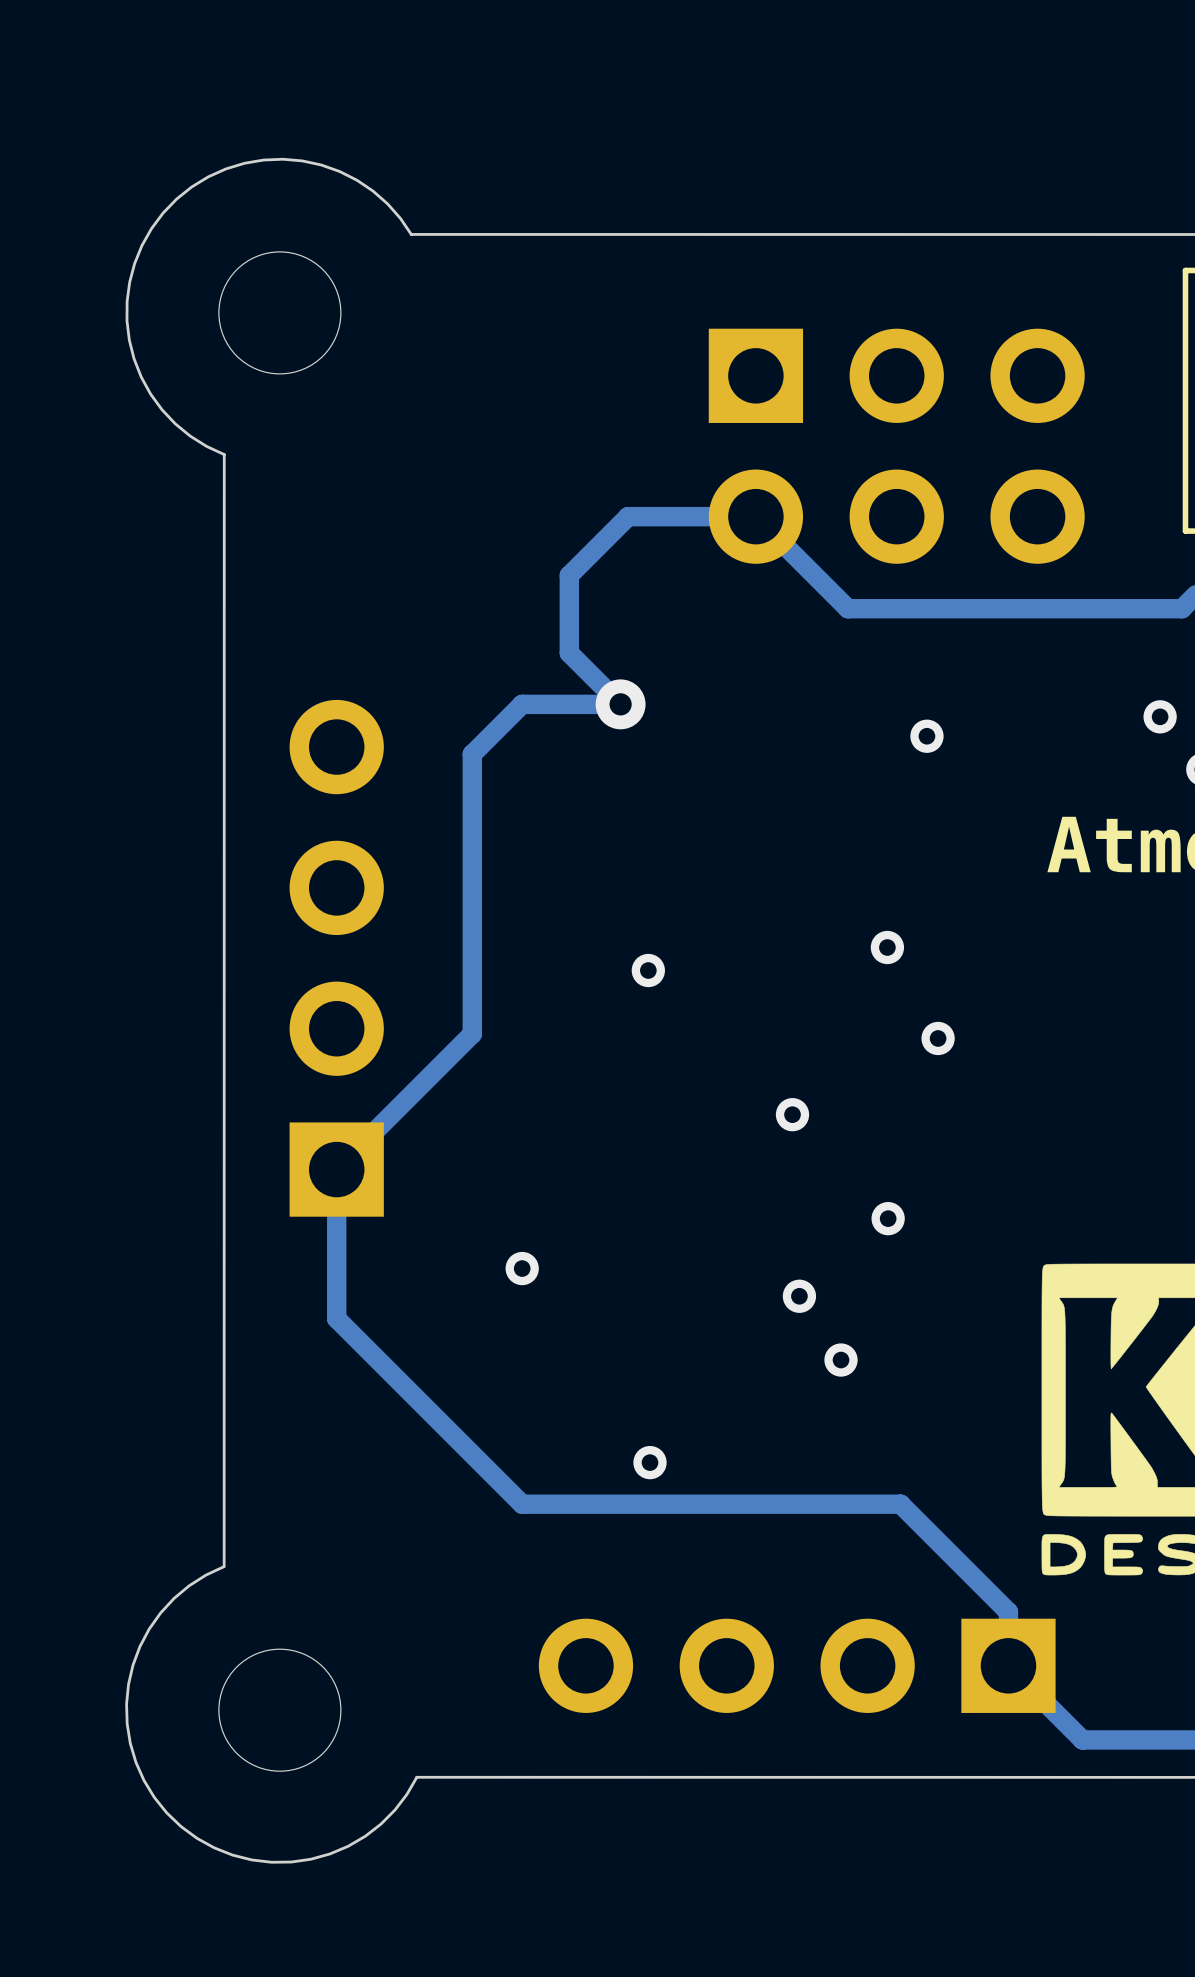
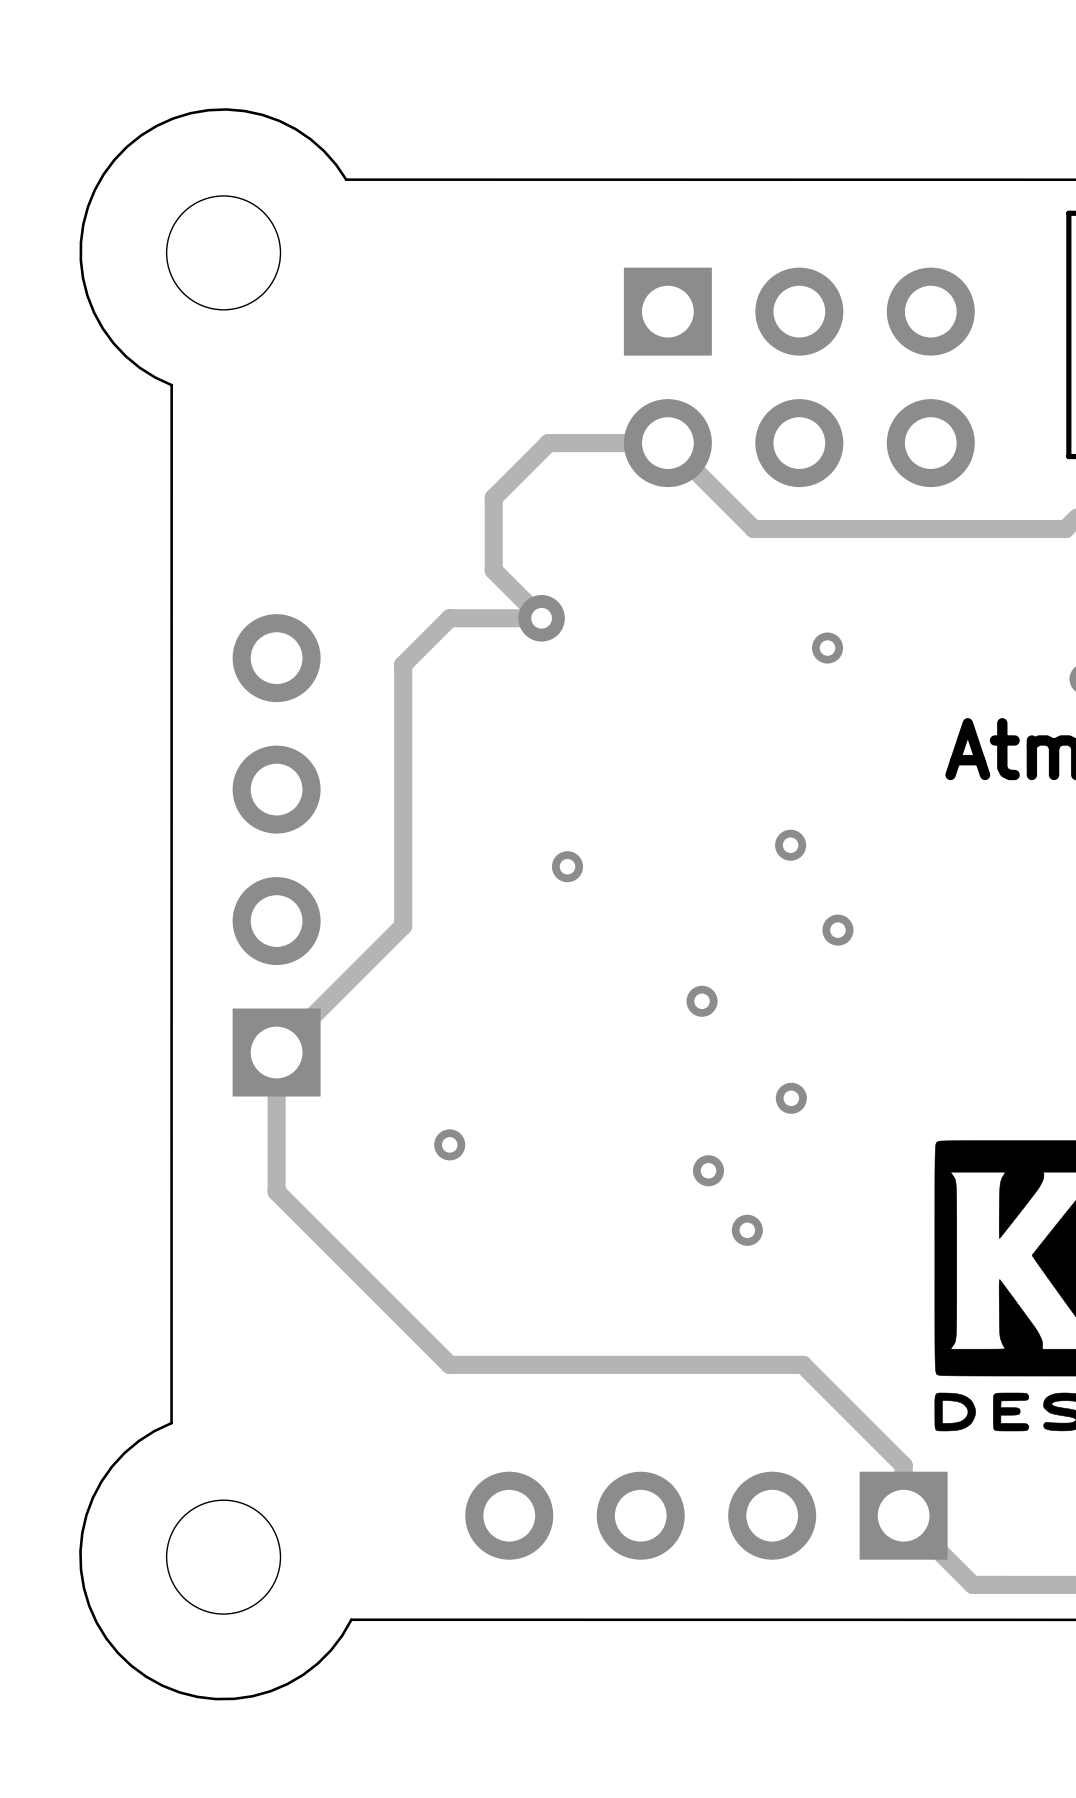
via: (1160, 716) -> none
via: (650, 1462) -> none

